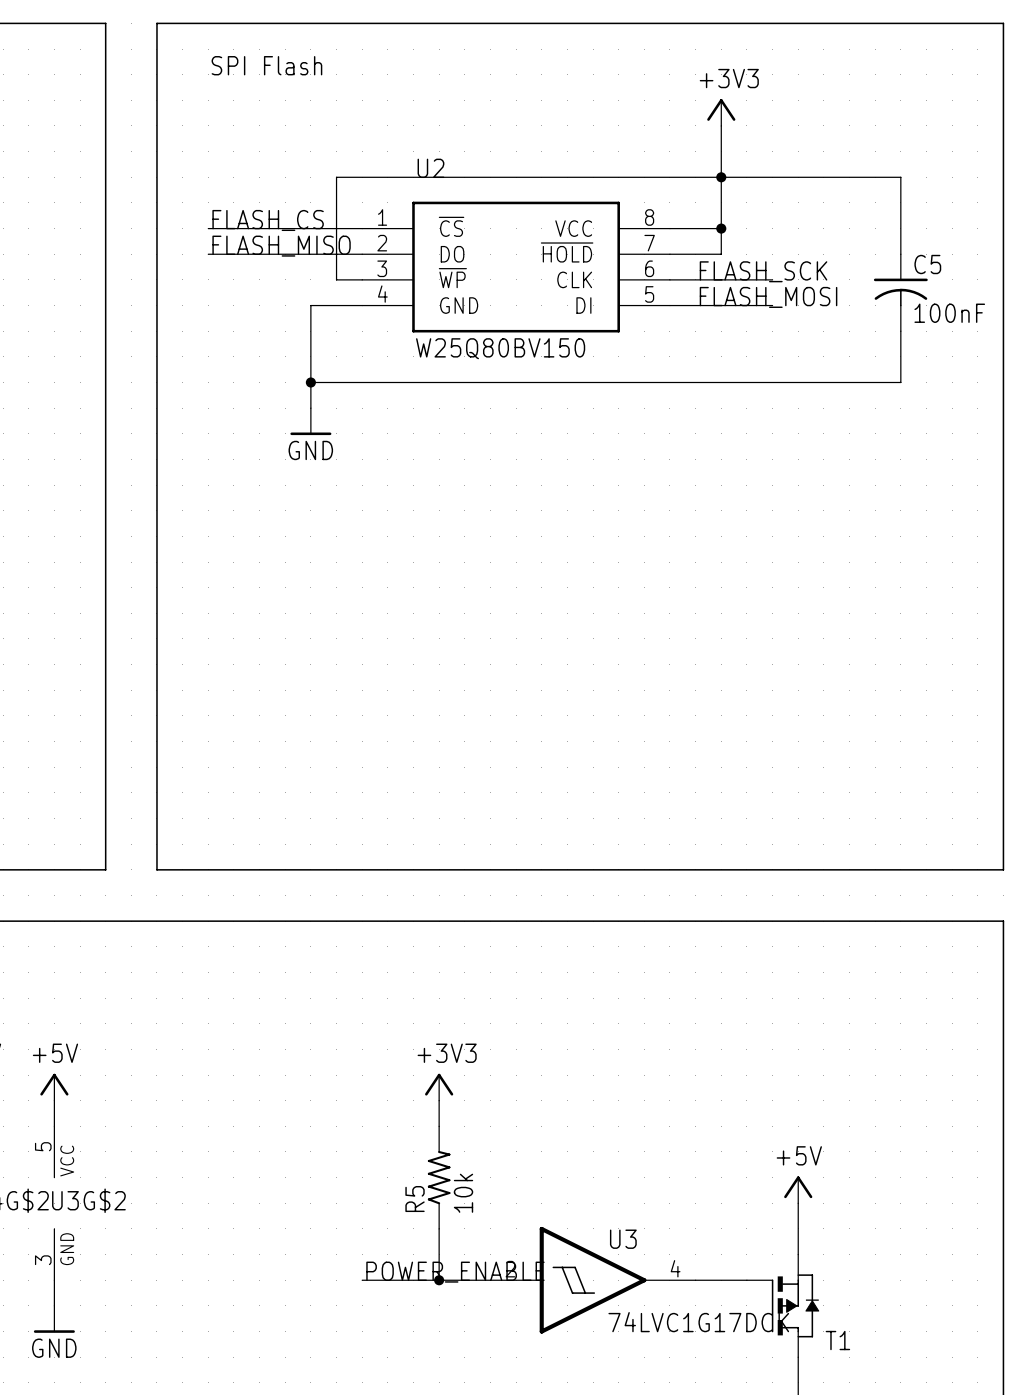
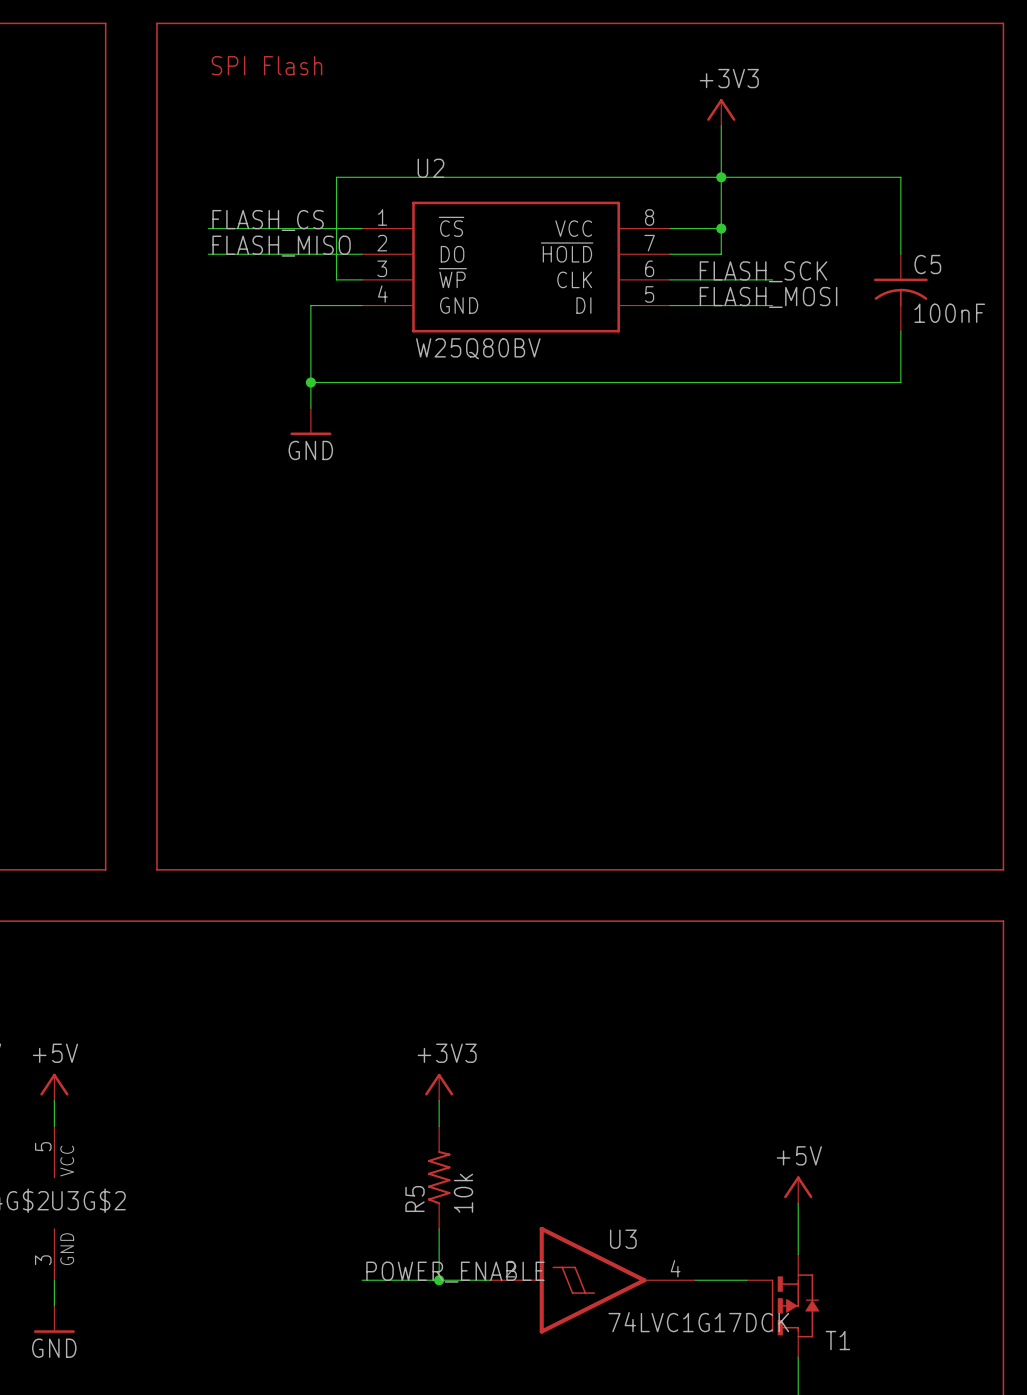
U2 value: W25Q80BV150 (500, 348) -> W25Q80BV (478, 348)

